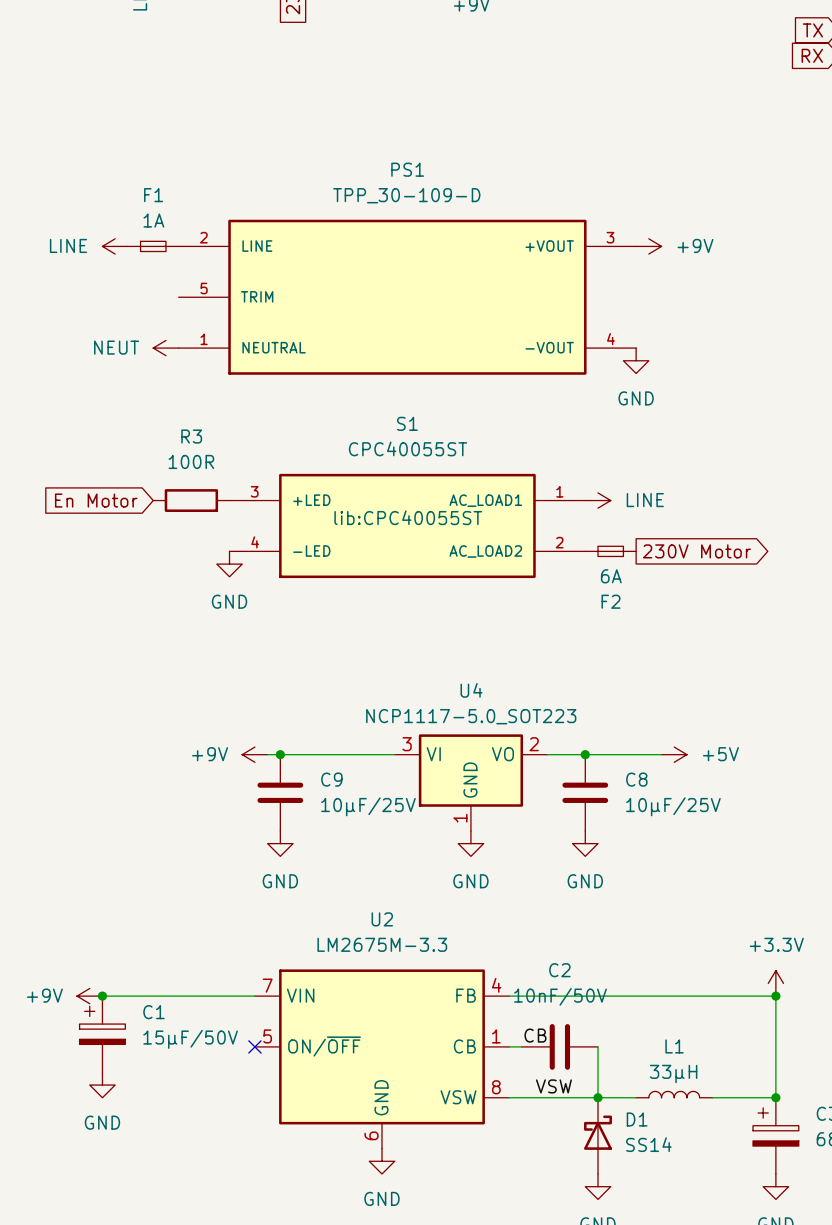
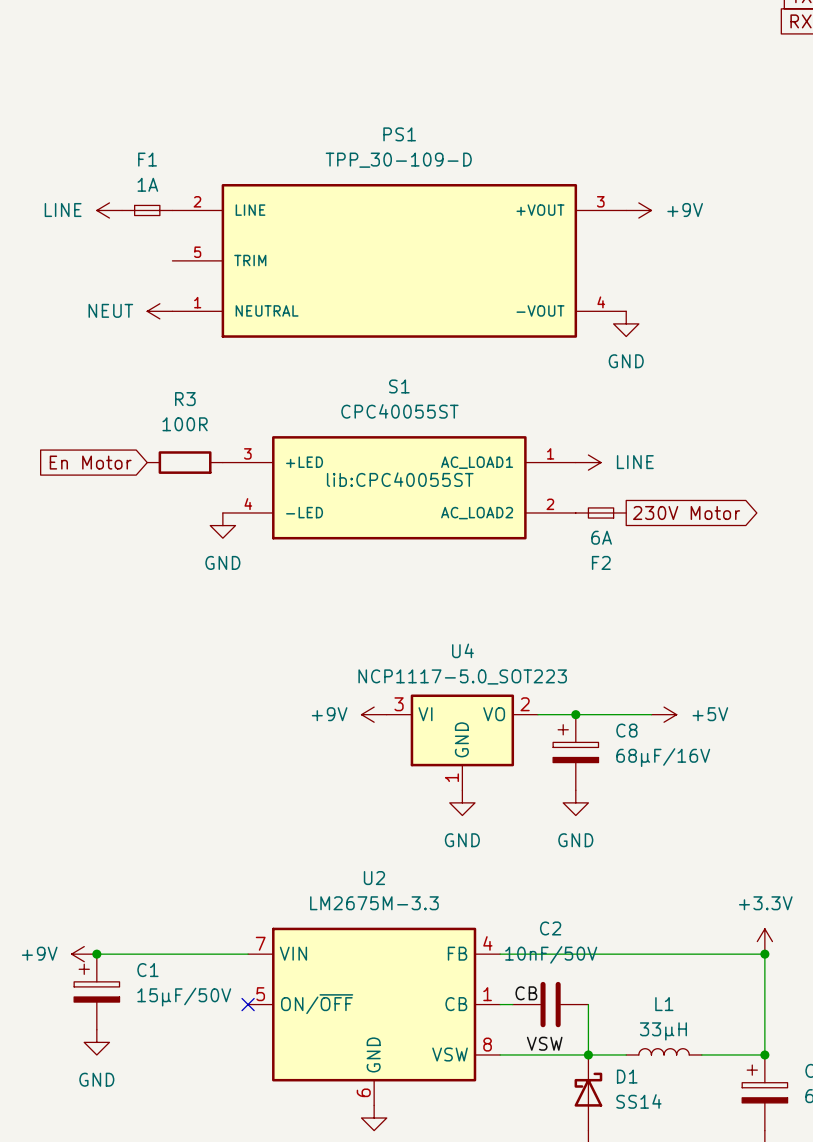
power symbol position: +9V (254, 754) -> +9V (374, 714)
wire: (267, 754) (394, 754) -> none
junction: (280, 754) -> none
C8 symbol: [562, 754, 609, 831] -> [553, 714, 599, 791]
C9: 10µF/25V (280, 792) -> none
C8 value: 10µF/25V (673, 806) -> 68µF/16V (663, 757)
power symbol: GND (280, 843) -> none

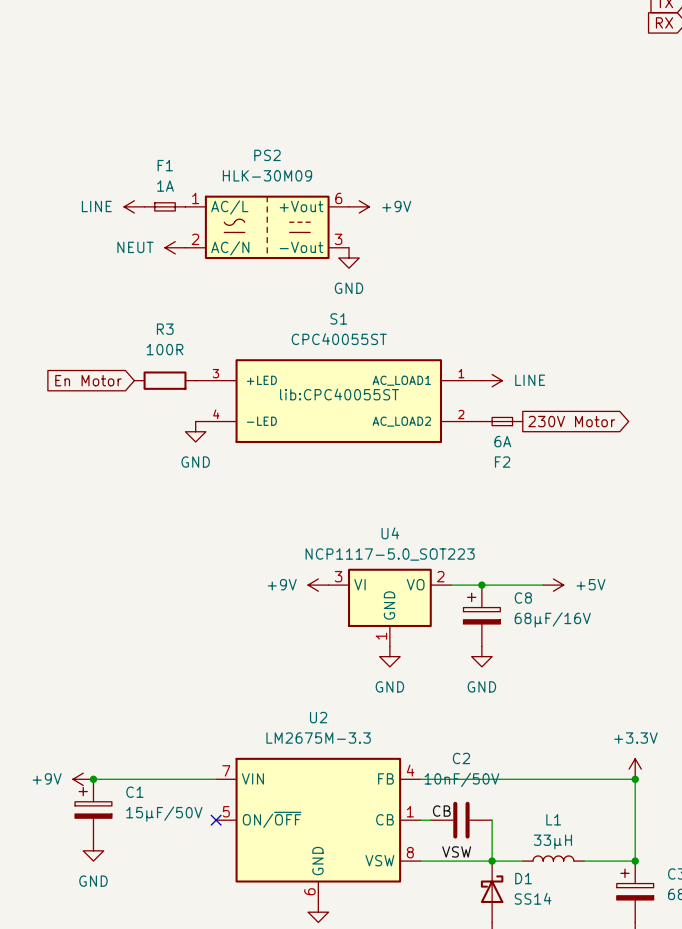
power symbol position: LINE (109, 210) -> LINE (134, 206)
F1 position: (147, 210) -> (165, 206)
power symbol position: +9V (638, 210) -> +9V (359, 206)
PS1: TPP_30-109-D (399, 260) -> none
PS2: none -> HLK-30M09 (267, 227)
power symbol position: NEUT (159, 311) -> NEUT (175, 247)
power symbol position: GND (626, 323) -> GND (349, 258)

